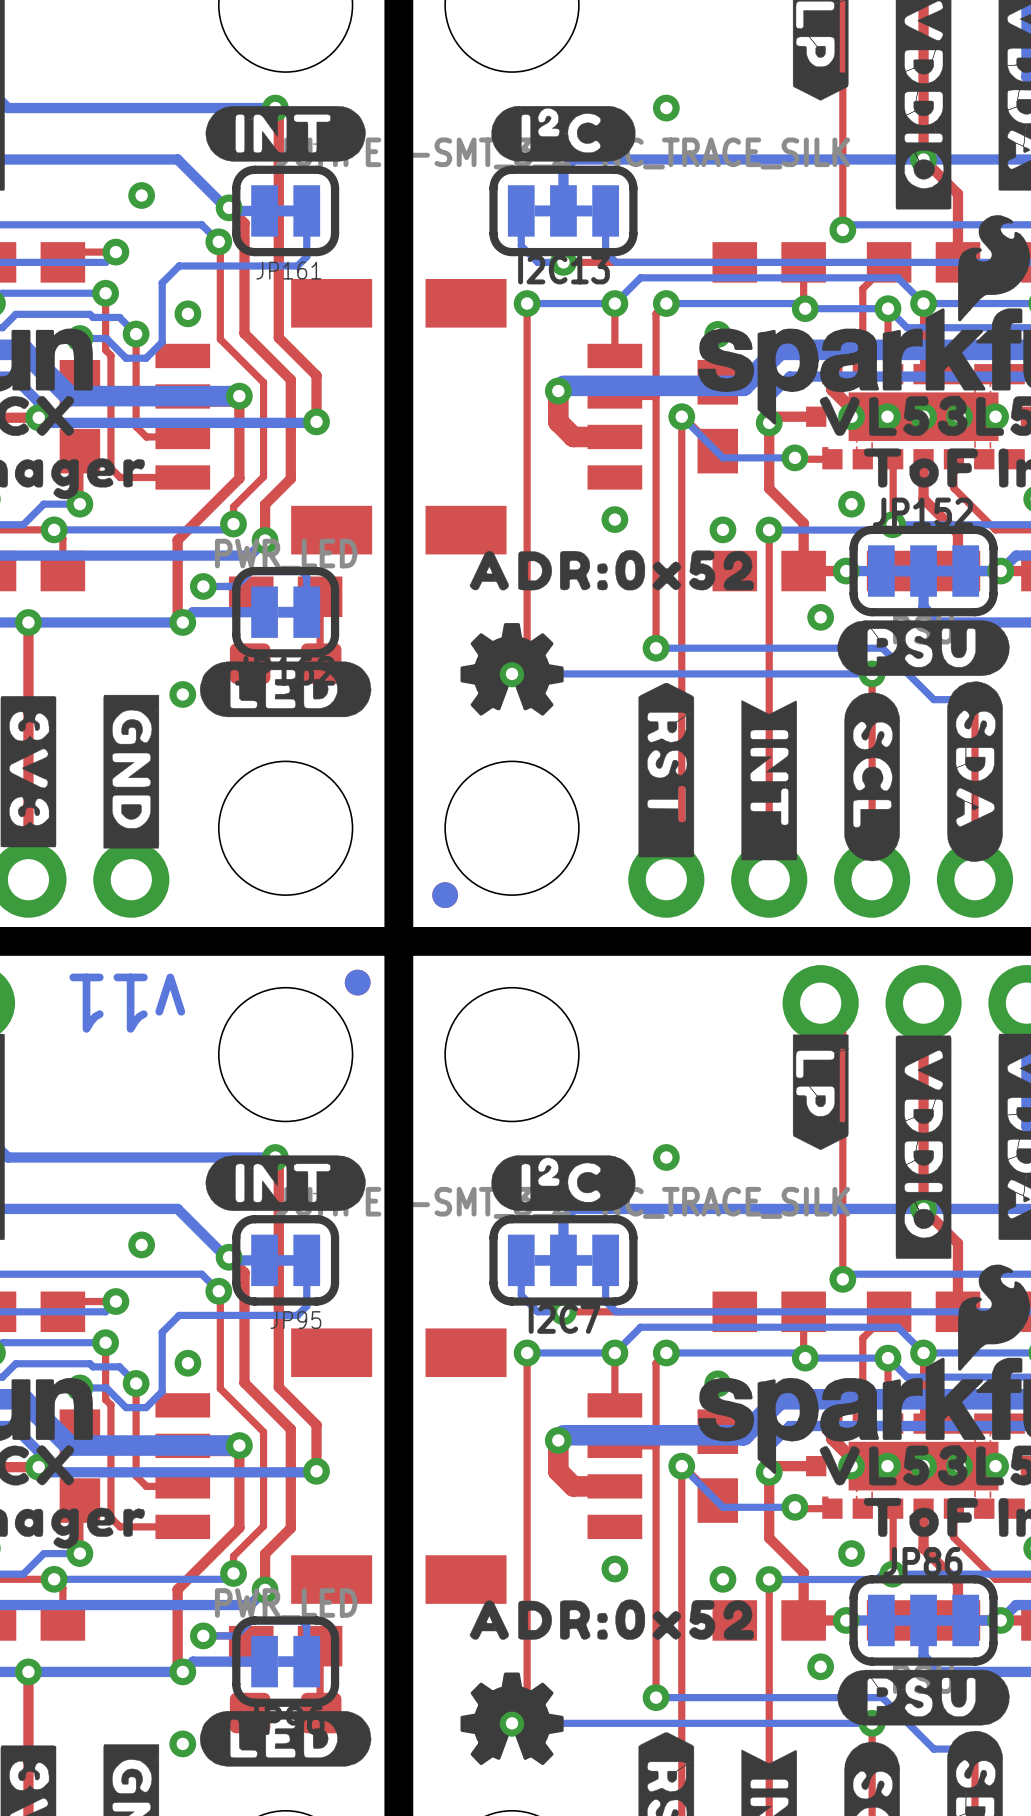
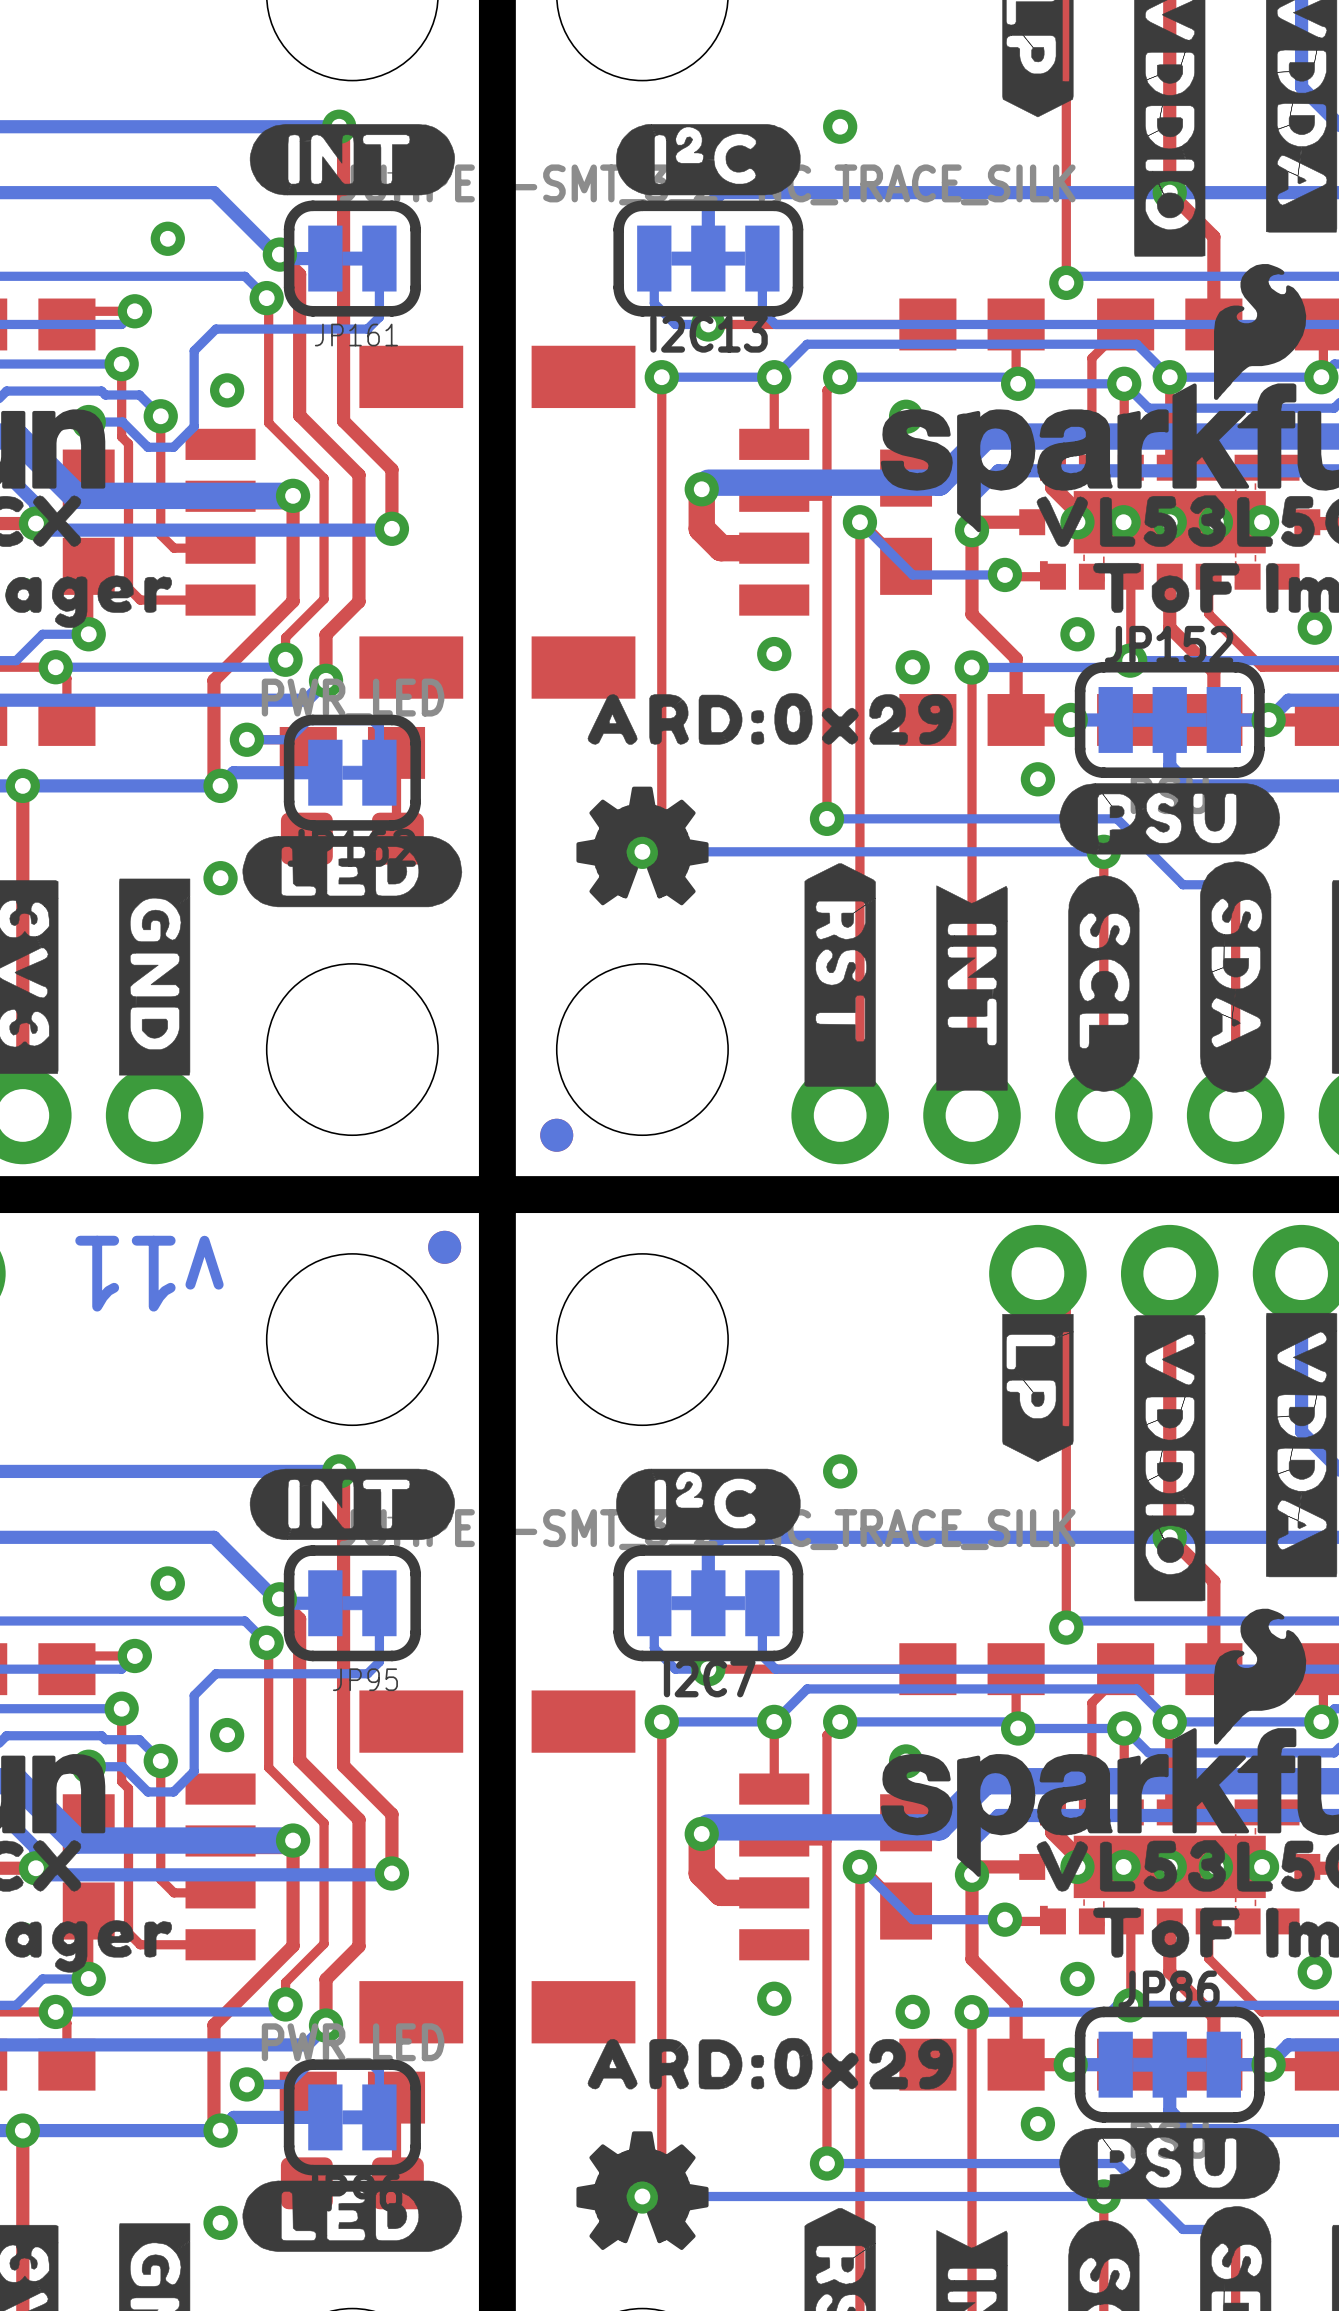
drawing shape: [469, 550, 755, 591] -> [587, 693, 954, 745]
drawing shape: [469, 1599, 755, 1640] -> [587, 2037, 954, 2090]

